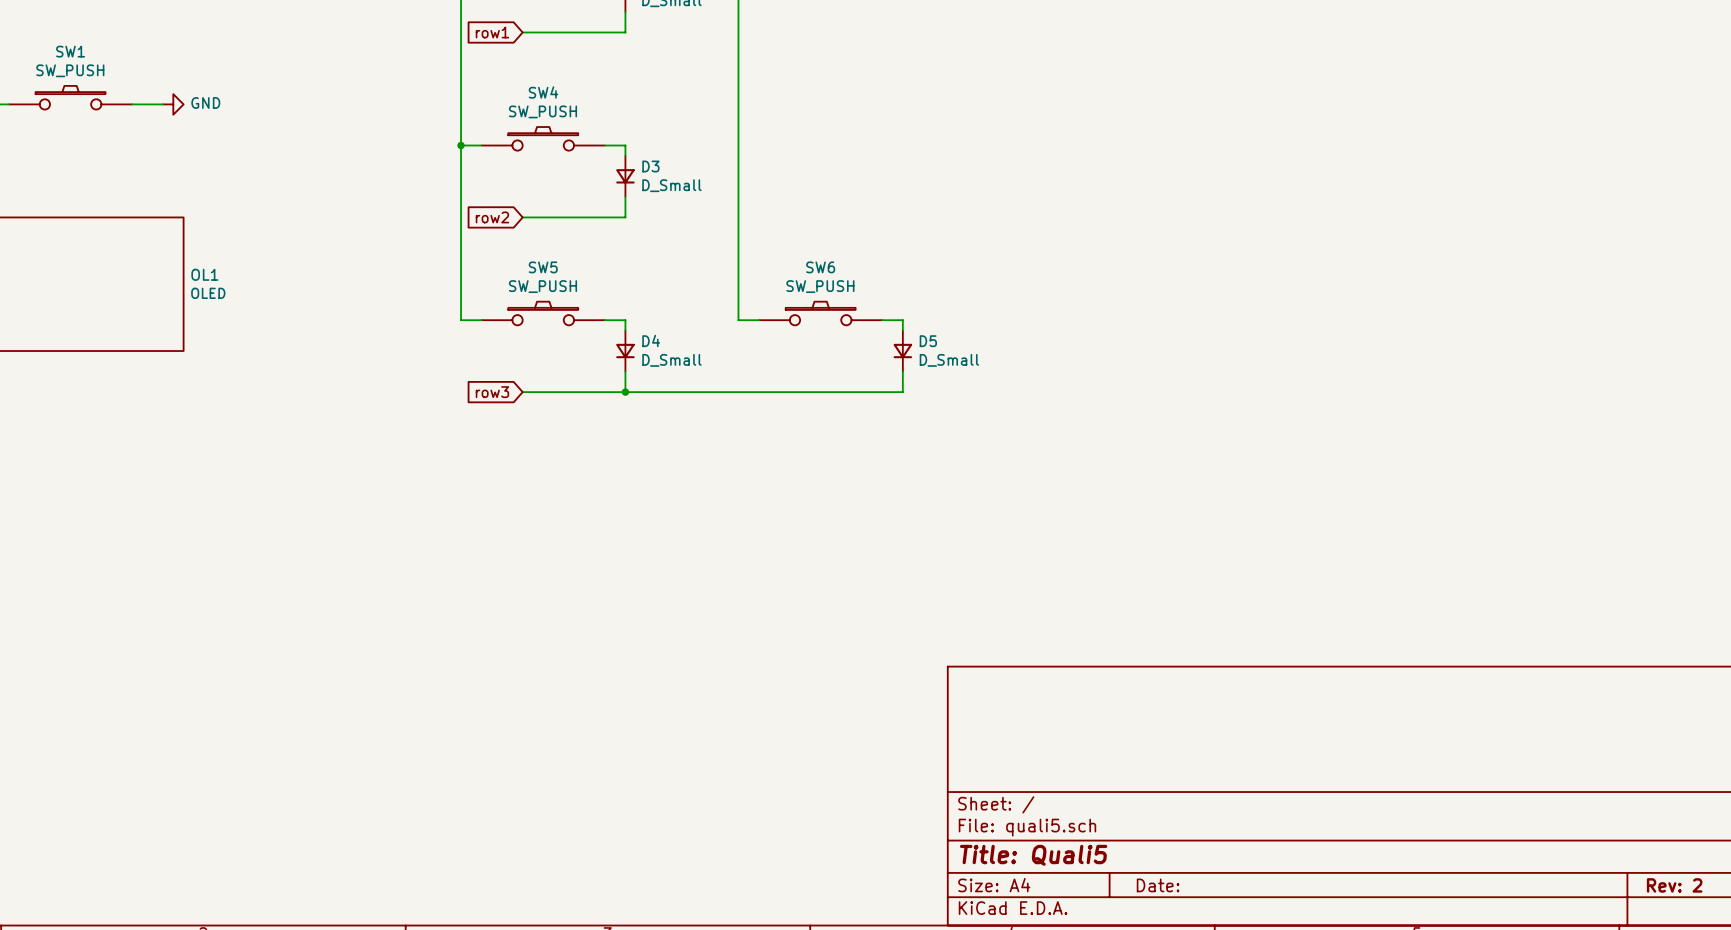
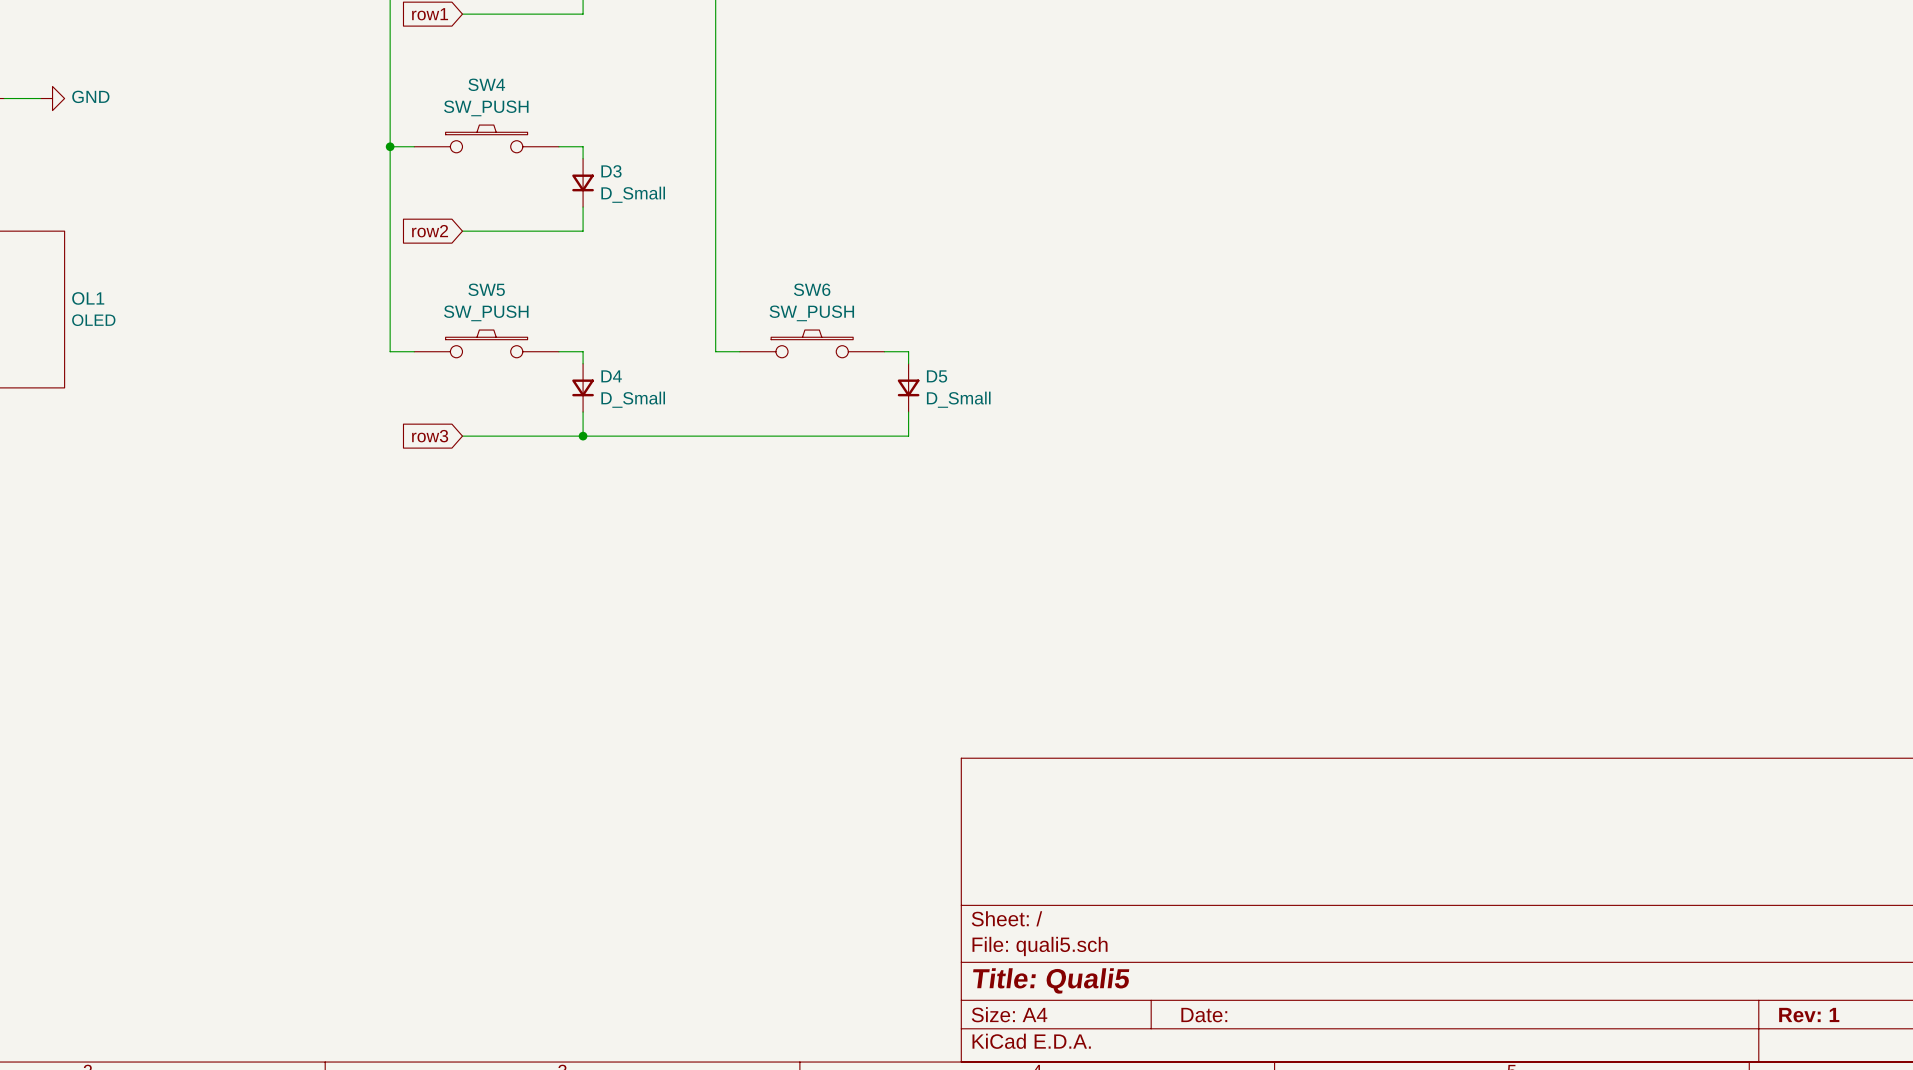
title block: Rev: 2 (1674, 885) -> Rev: 1 (1809, 1015)

